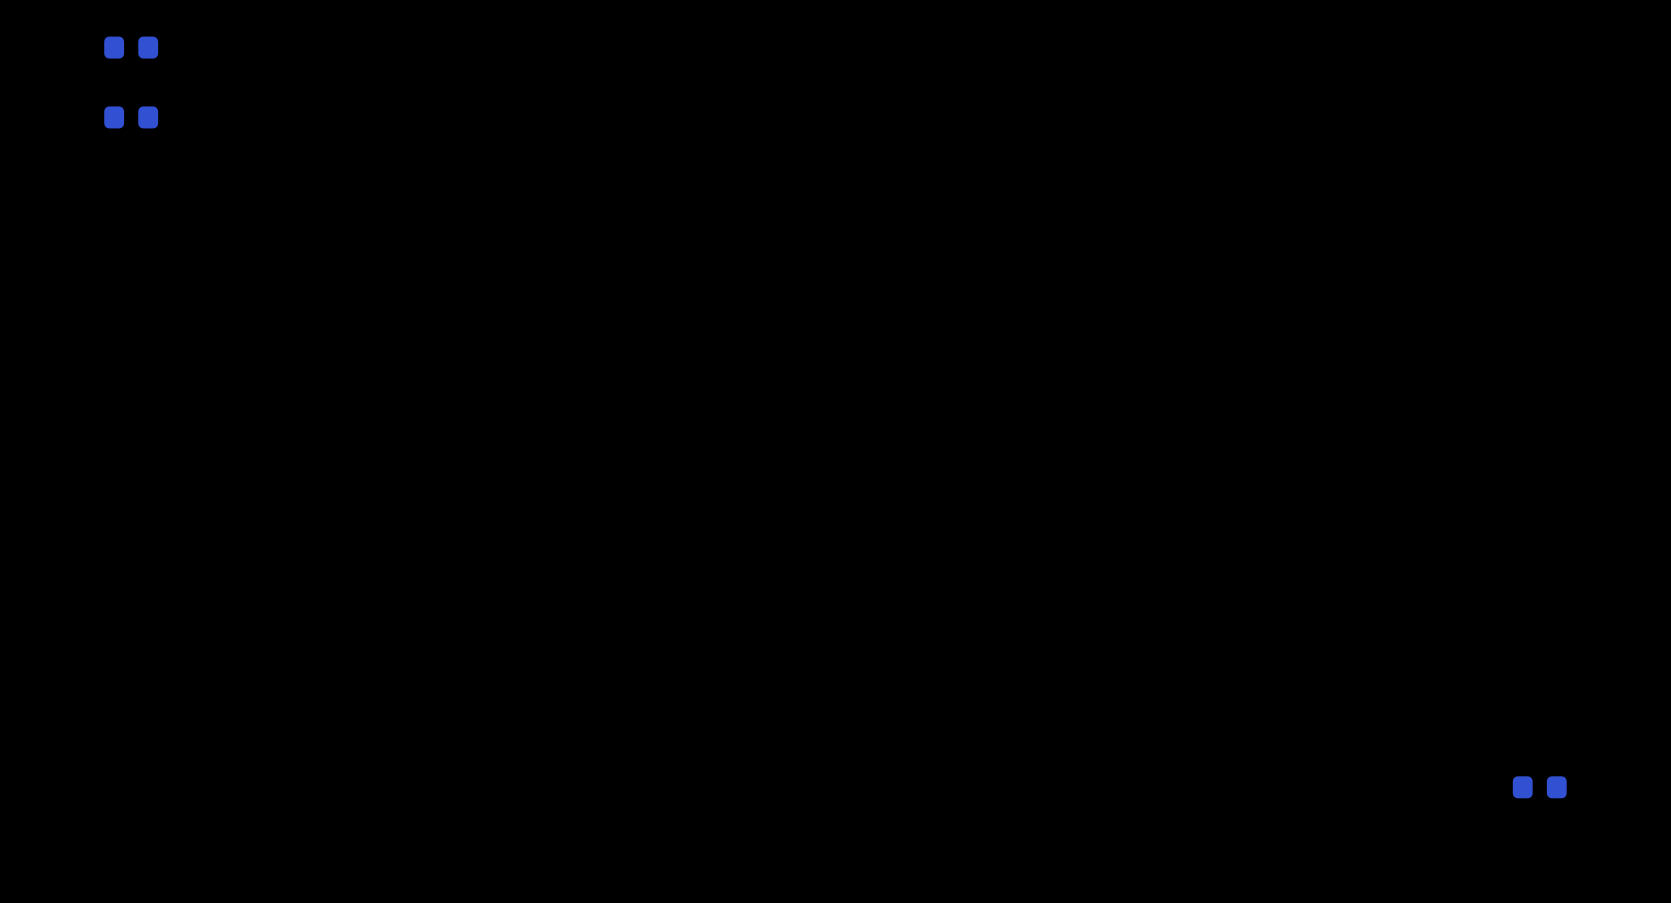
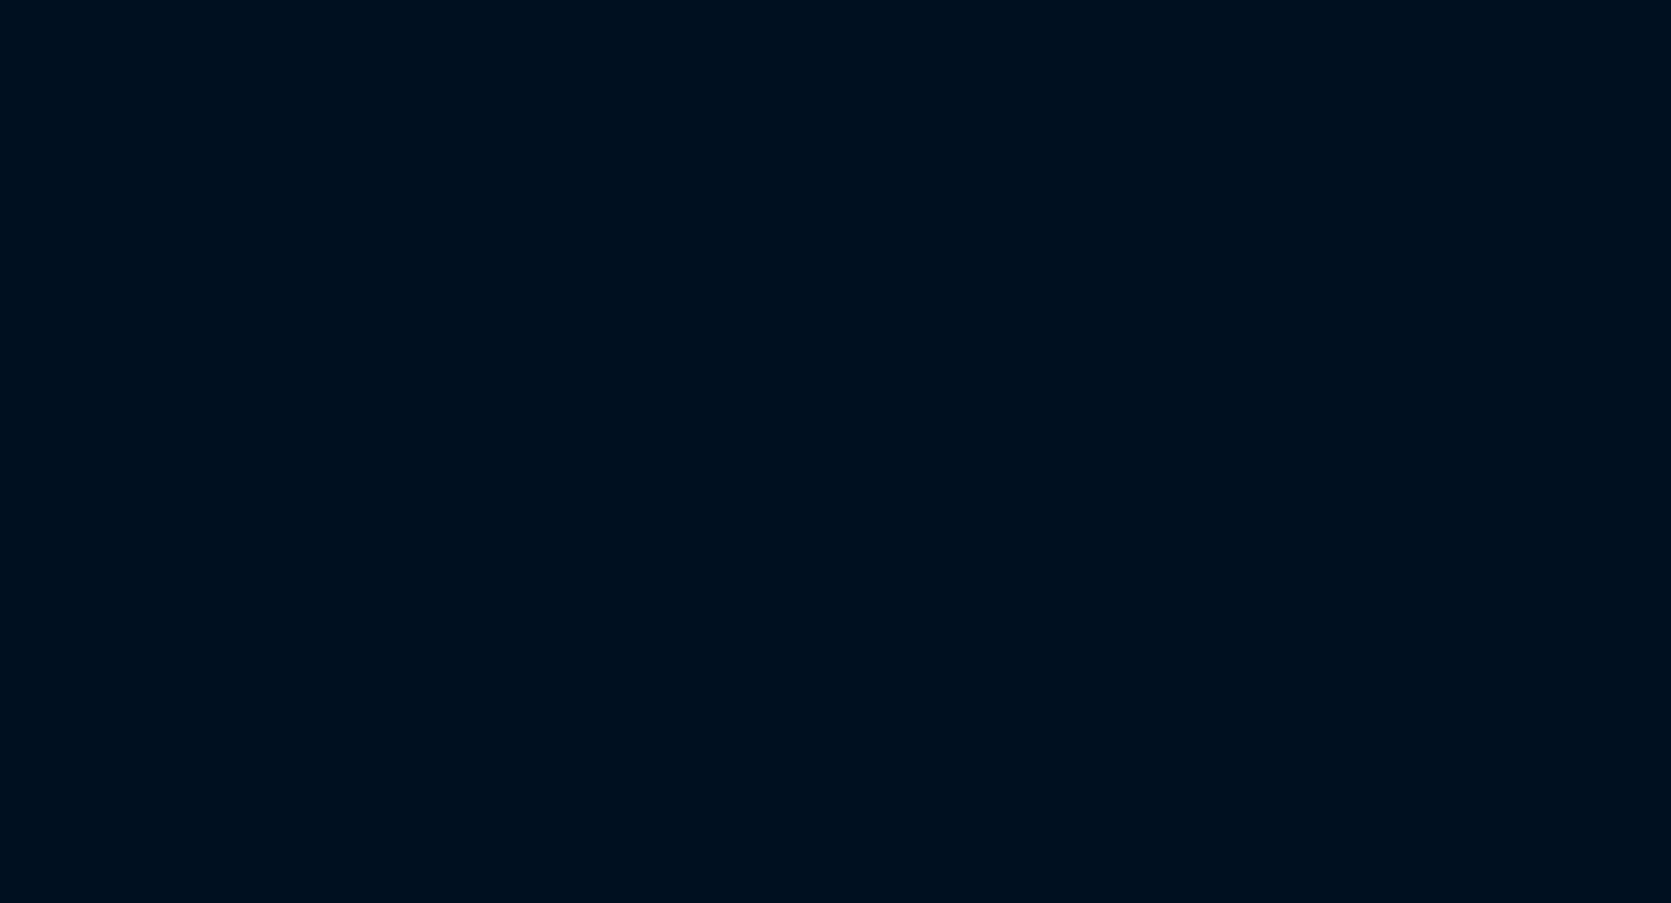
part: (131, 47) -> none
part: (131, 117) -> none
part: (1539, 787) -> none

